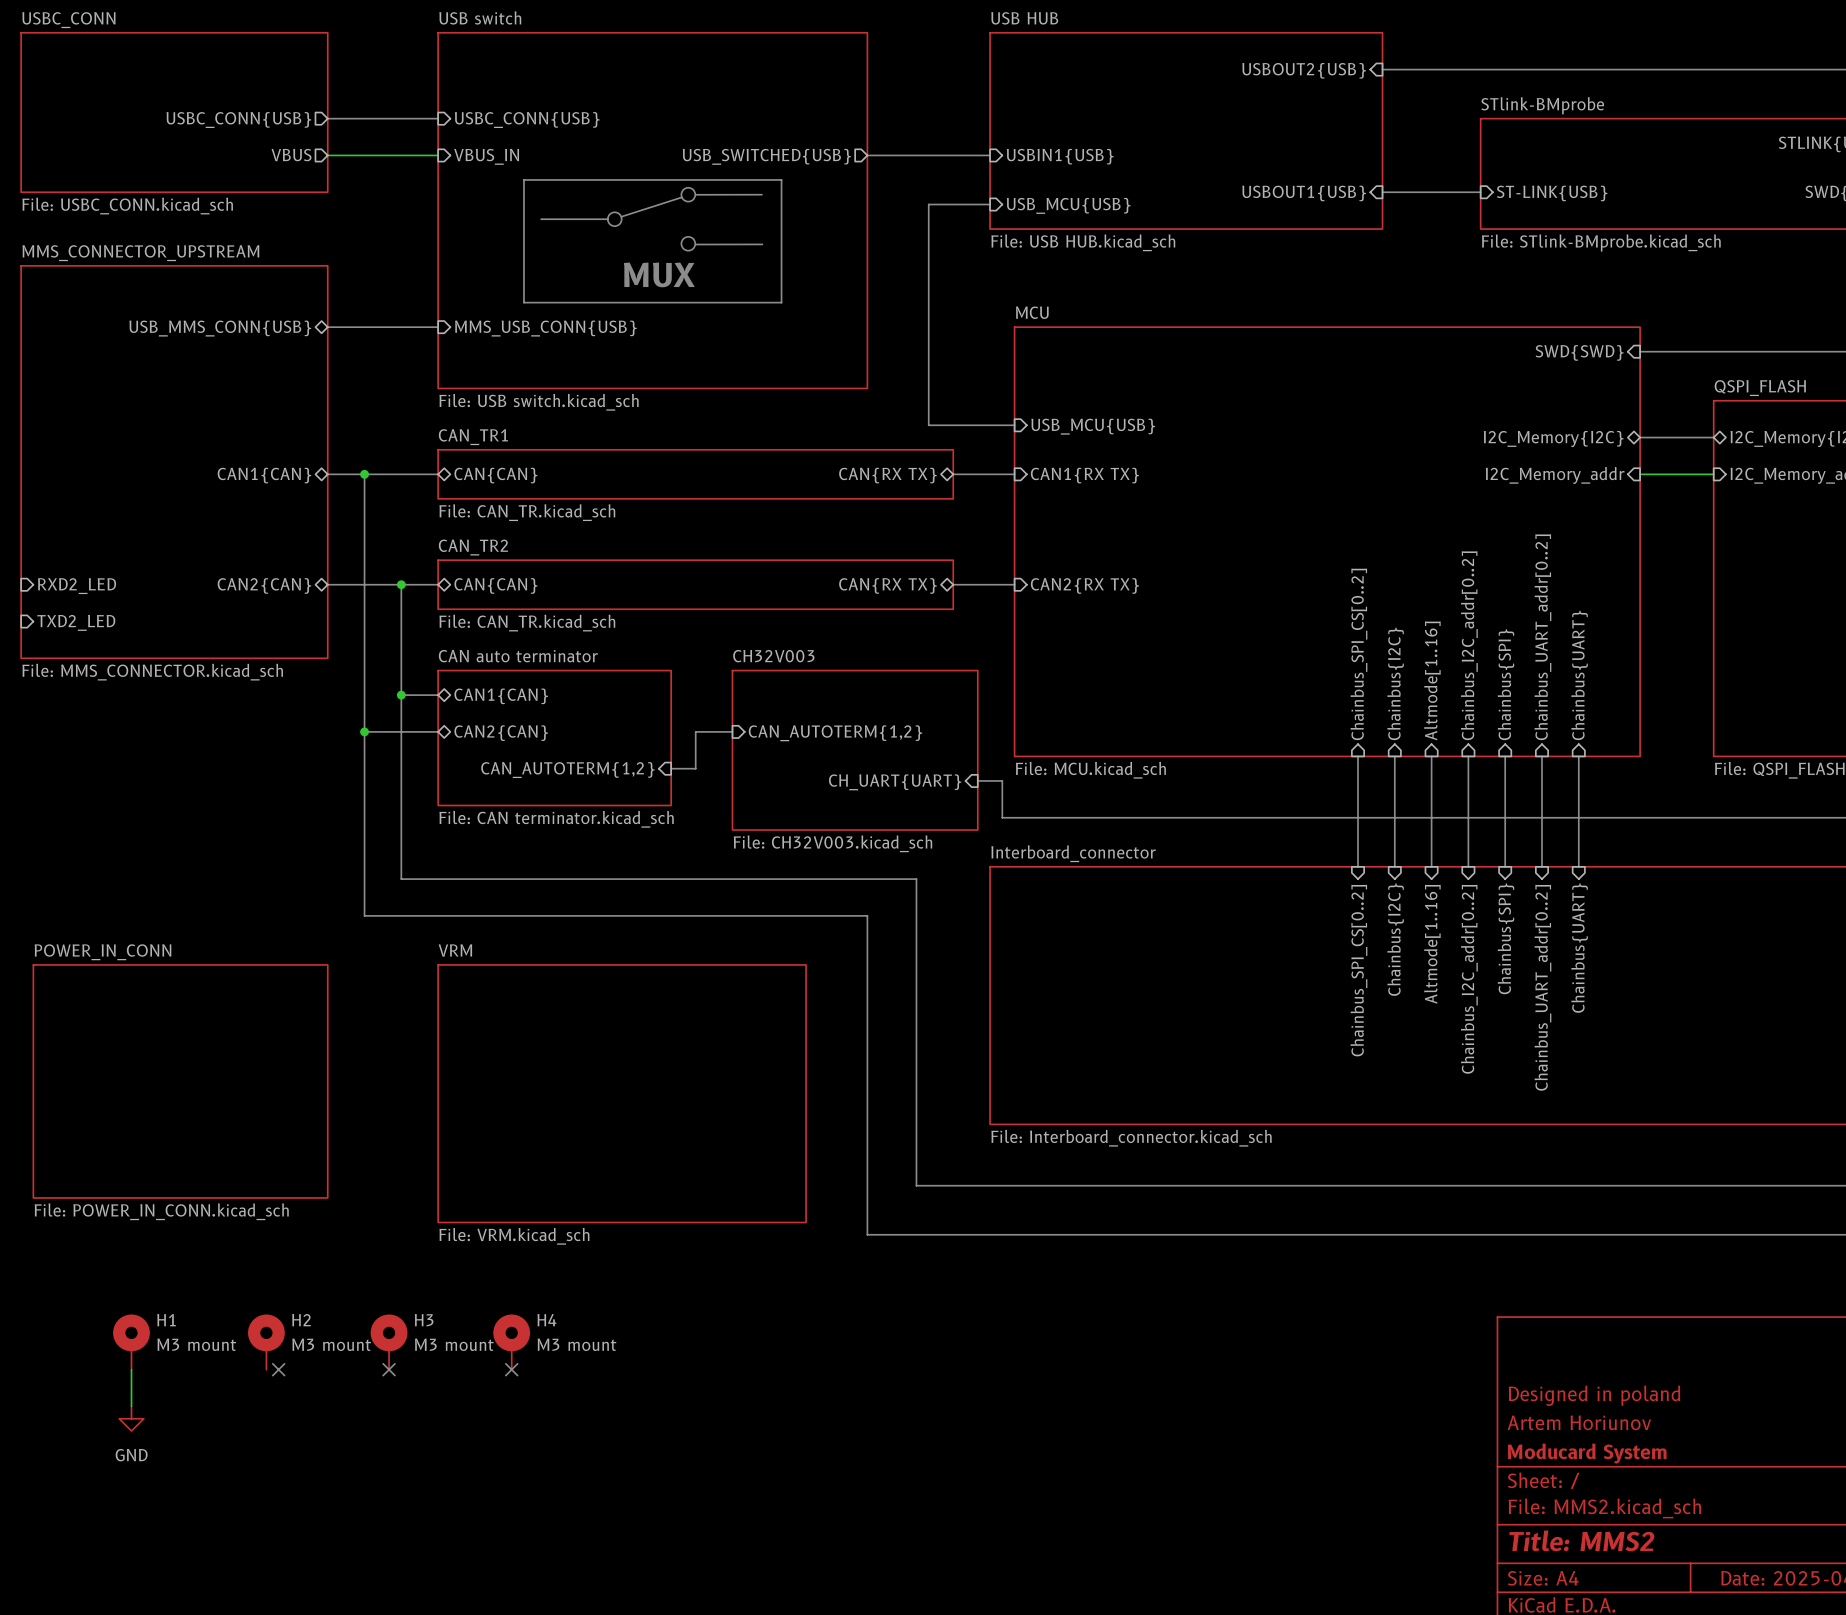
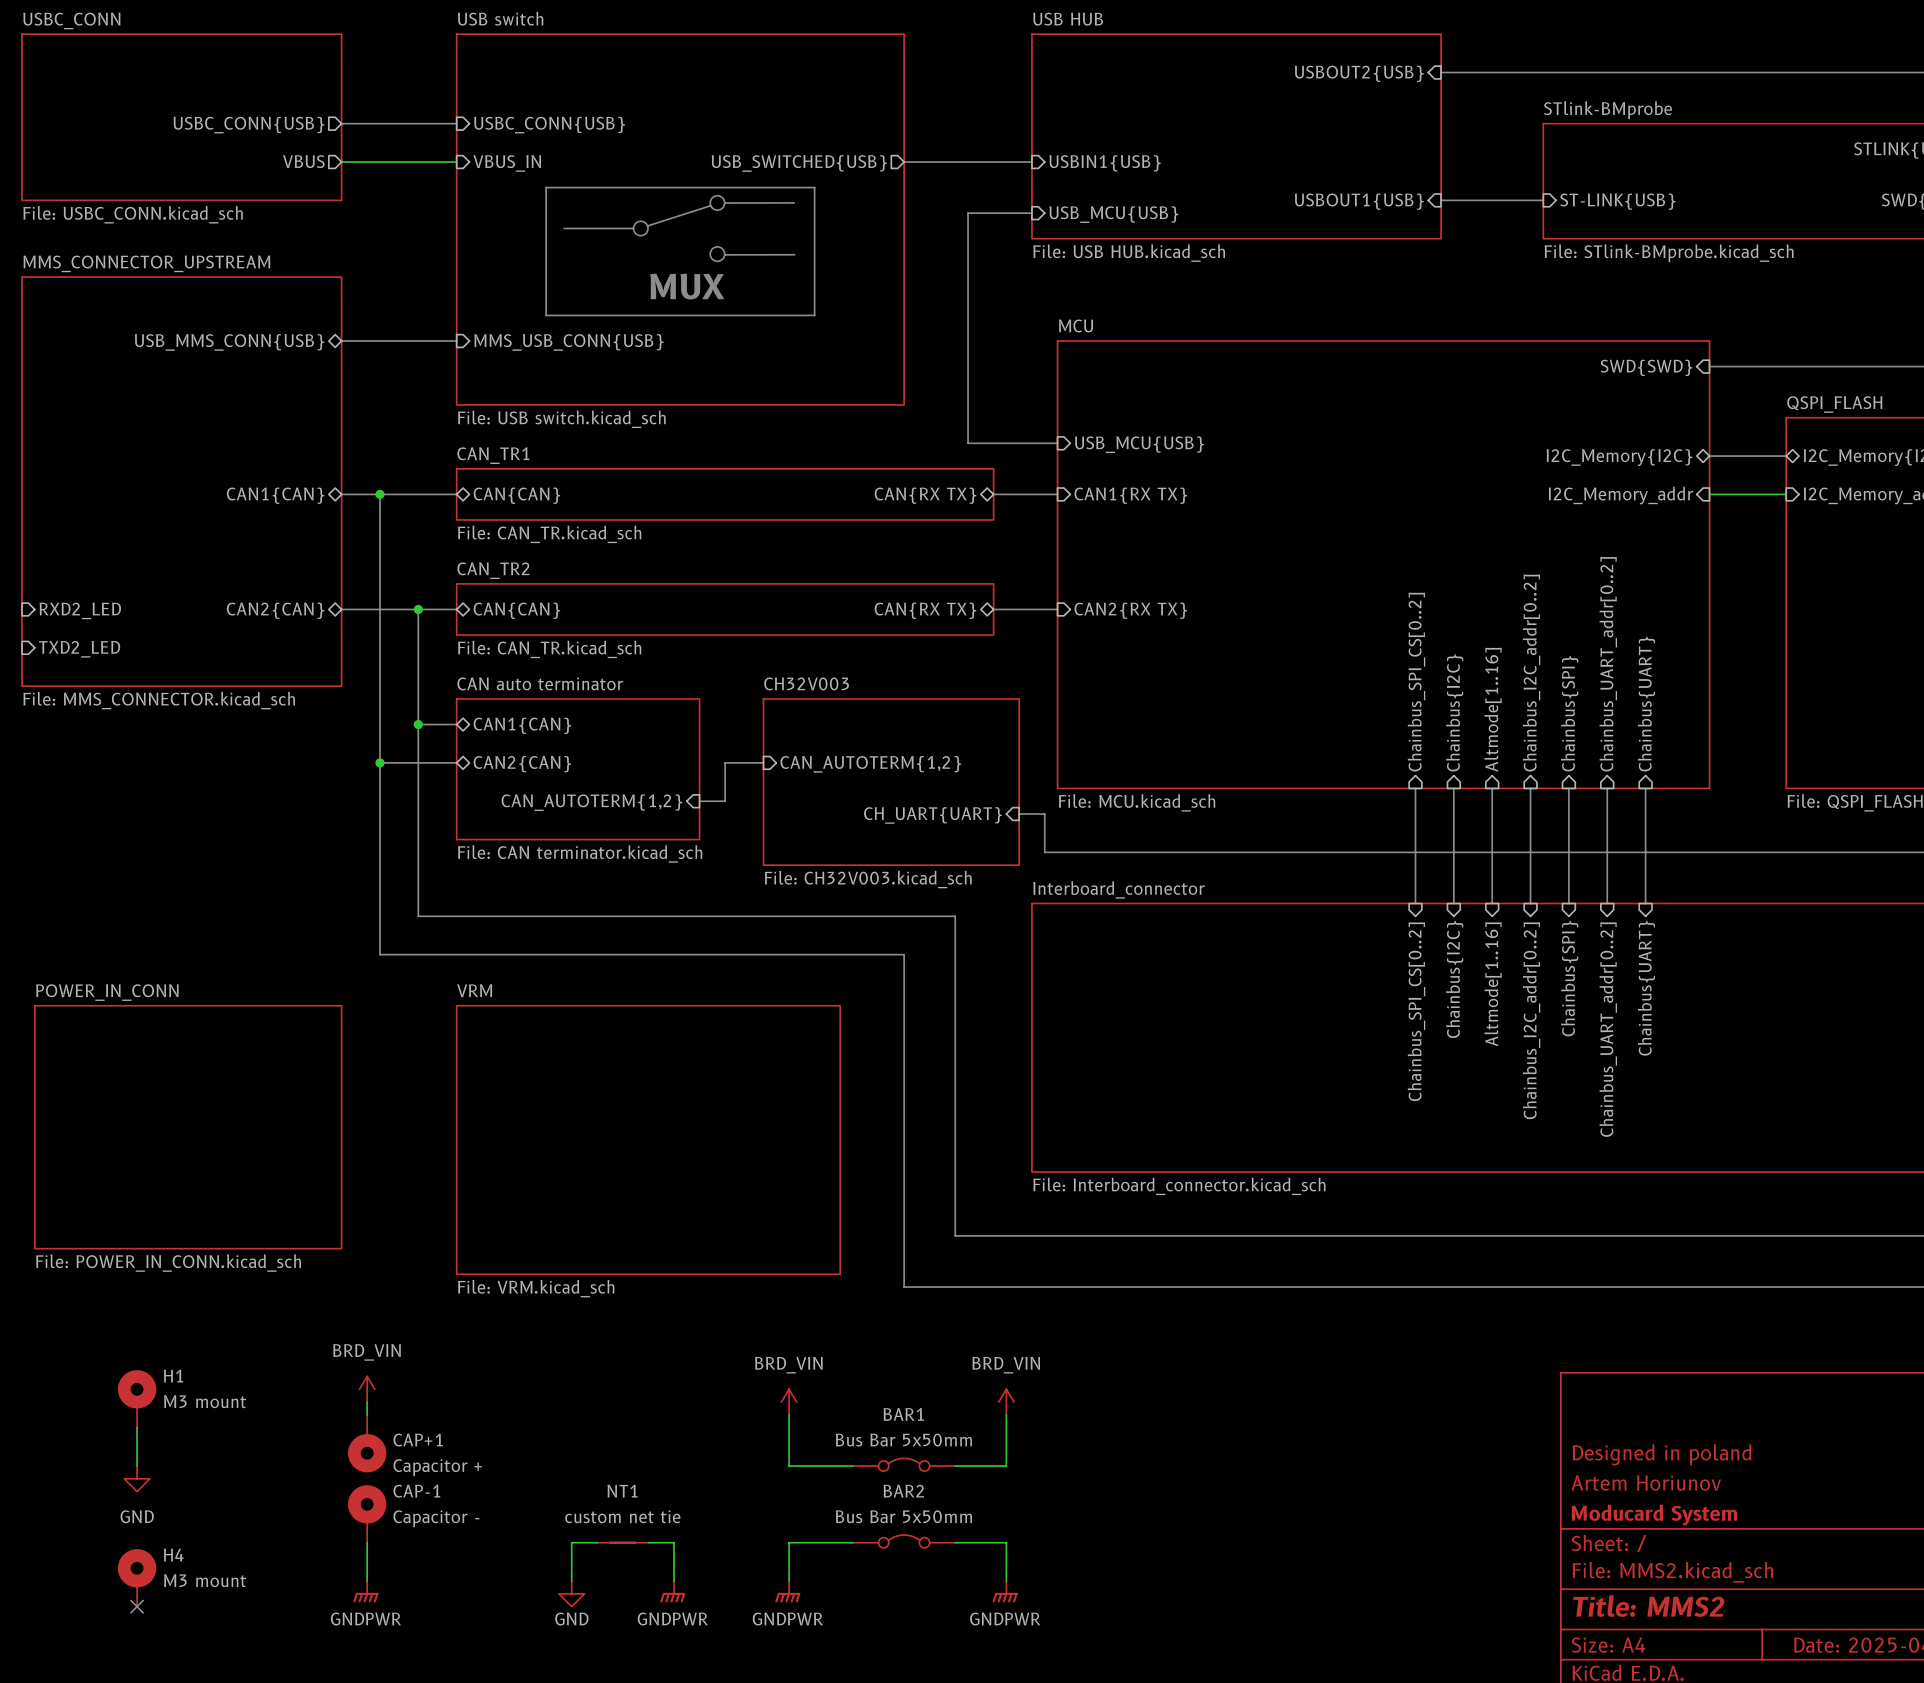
power symbol: none -> BRD_VIN (367, 1389)
H2: M3 mount (266, 1342) -> none
H3: M3 mount (389, 1342) -> none
H4 position: (511, 1342) -> (137, 1577)
wire: none -> (367, 1402) (367, 1414)
power symbol: none -> BRD_VIN (789, 1402)
power symbol: none -> BRD_VIN (1006, 1402)
wire: none -> (789, 1414) (789, 1466) (852, 1466)
wire: none -> (1006, 1414) (1006, 1466) (955, 1466)
no-connect mark: (278, 1369) -> none
no-connect mark: (389, 1369) -> none
no-connect mark: (511, 1369) -> none
CAP+1: none -> Capacitor + (367, 1443)
BAR1: none -> Bus Bar 5x50mm (904, 1464)
CAP-1: none -> Capacitor - (367, 1513)
BAR2: none -> Bus Bar 5x50mm (904, 1541)
wire: none -> (367, 1542) (367, 1581)
wire: none -> (597, 1542) (571, 1542) (571, 1581)
NT1: none -> custom net tie (622, 1542)
wire: none -> (648, 1542) (674, 1542) (674, 1581)
wire: none -> (852, 1542) (789, 1542) (789, 1581)
wire: none -> (955, 1542) (1006, 1542) (1006, 1581)
power symbol: none -> GNDPWR (365, 1591)
power symbol: none -> GNDPWR (672, 1591)
power symbol: none -> GNDPWR (787, 1591)
power symbol: none -> GNDPWR (1005, 1591)
power symbol: none -> GND (571, 1593)
no-connect mark: none -> (137, 1606)

